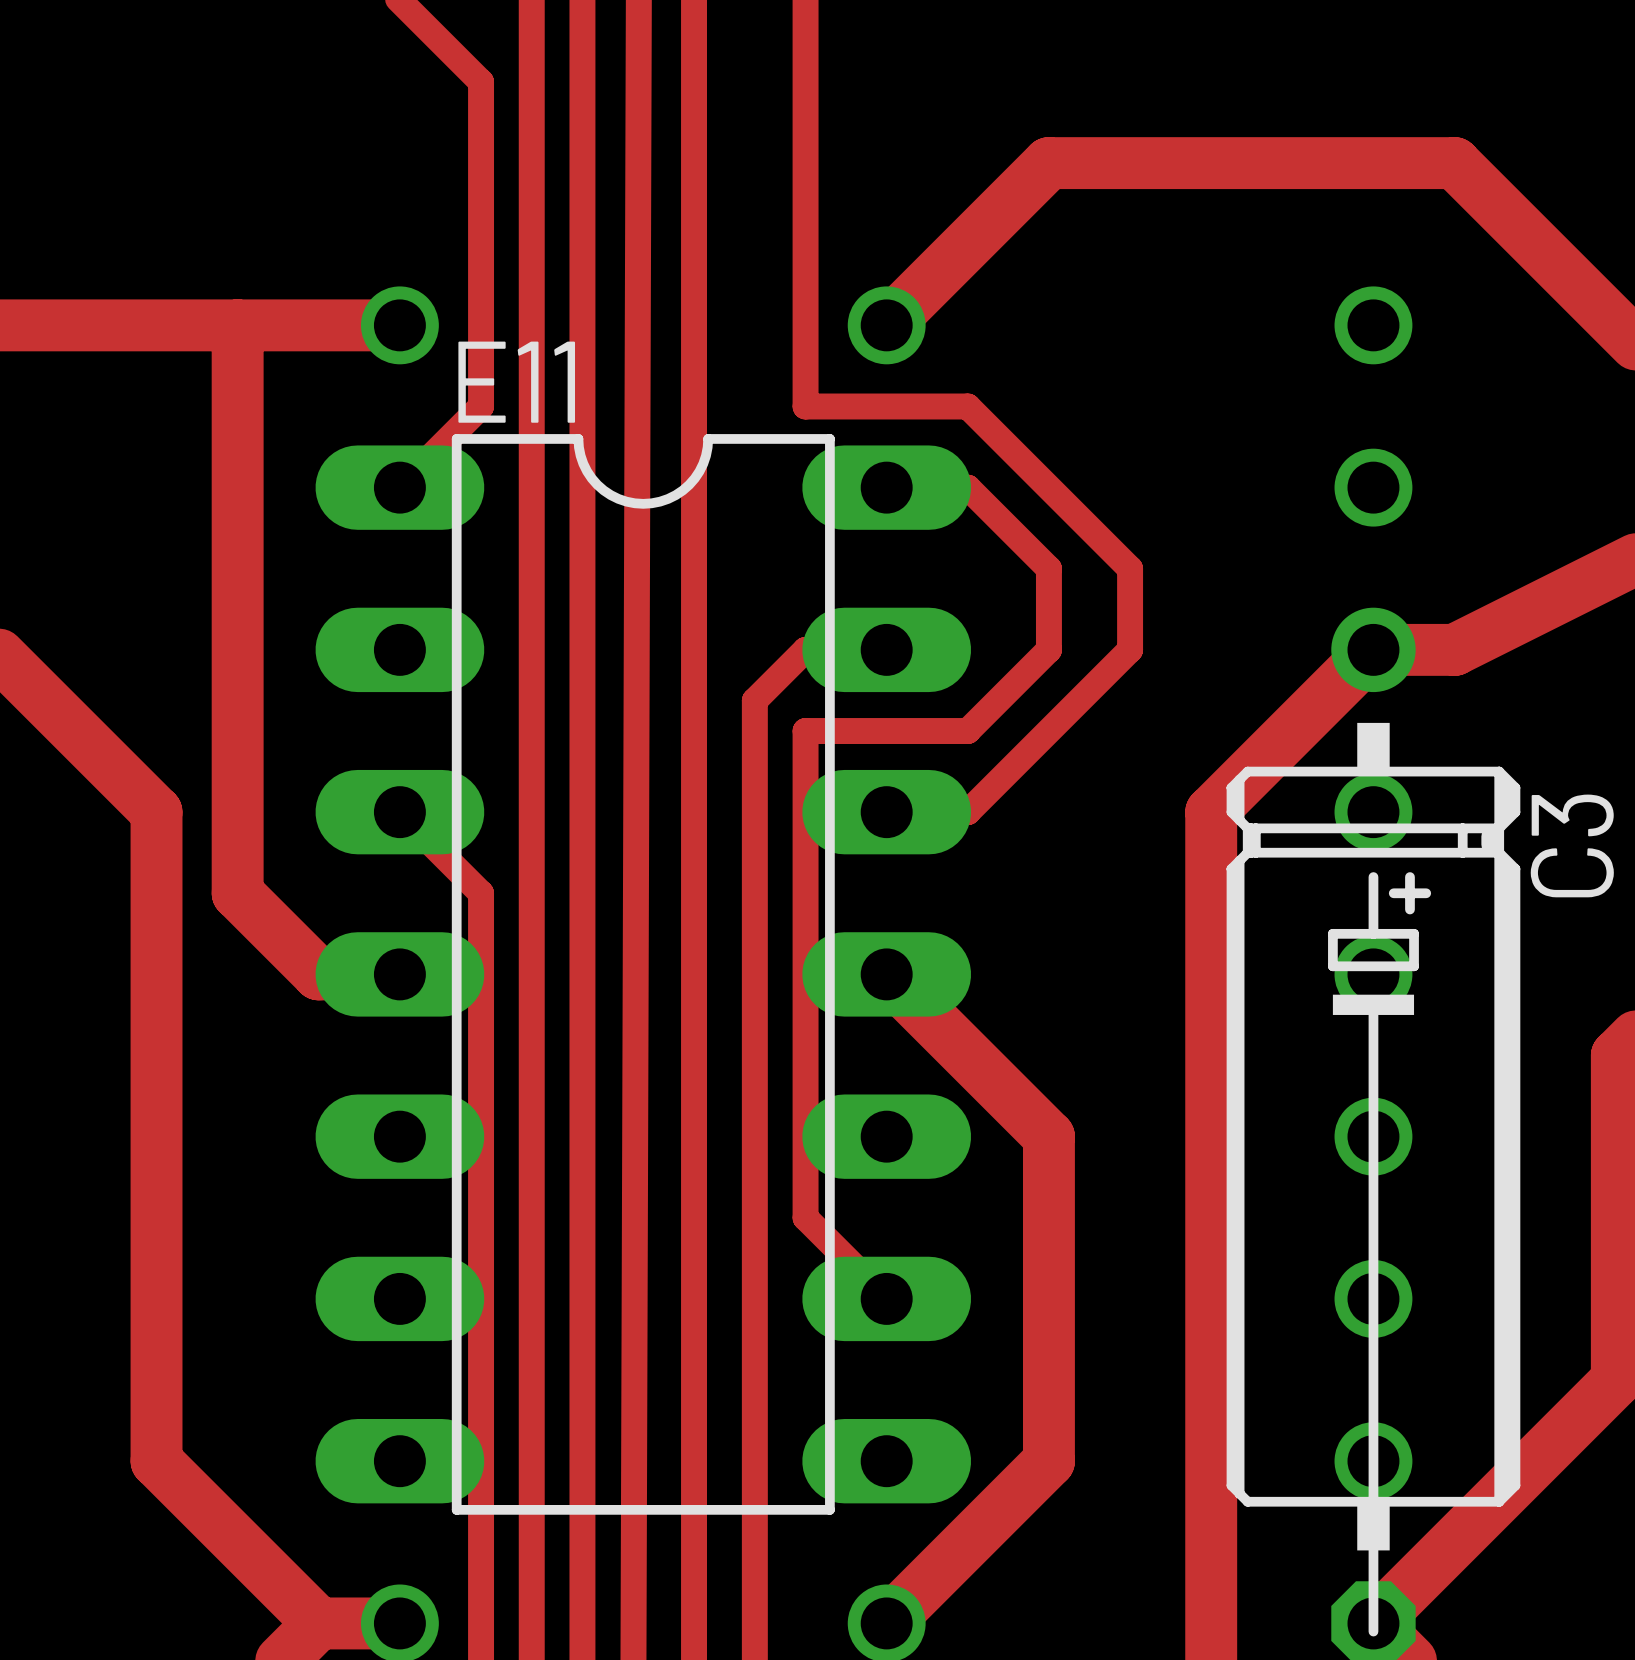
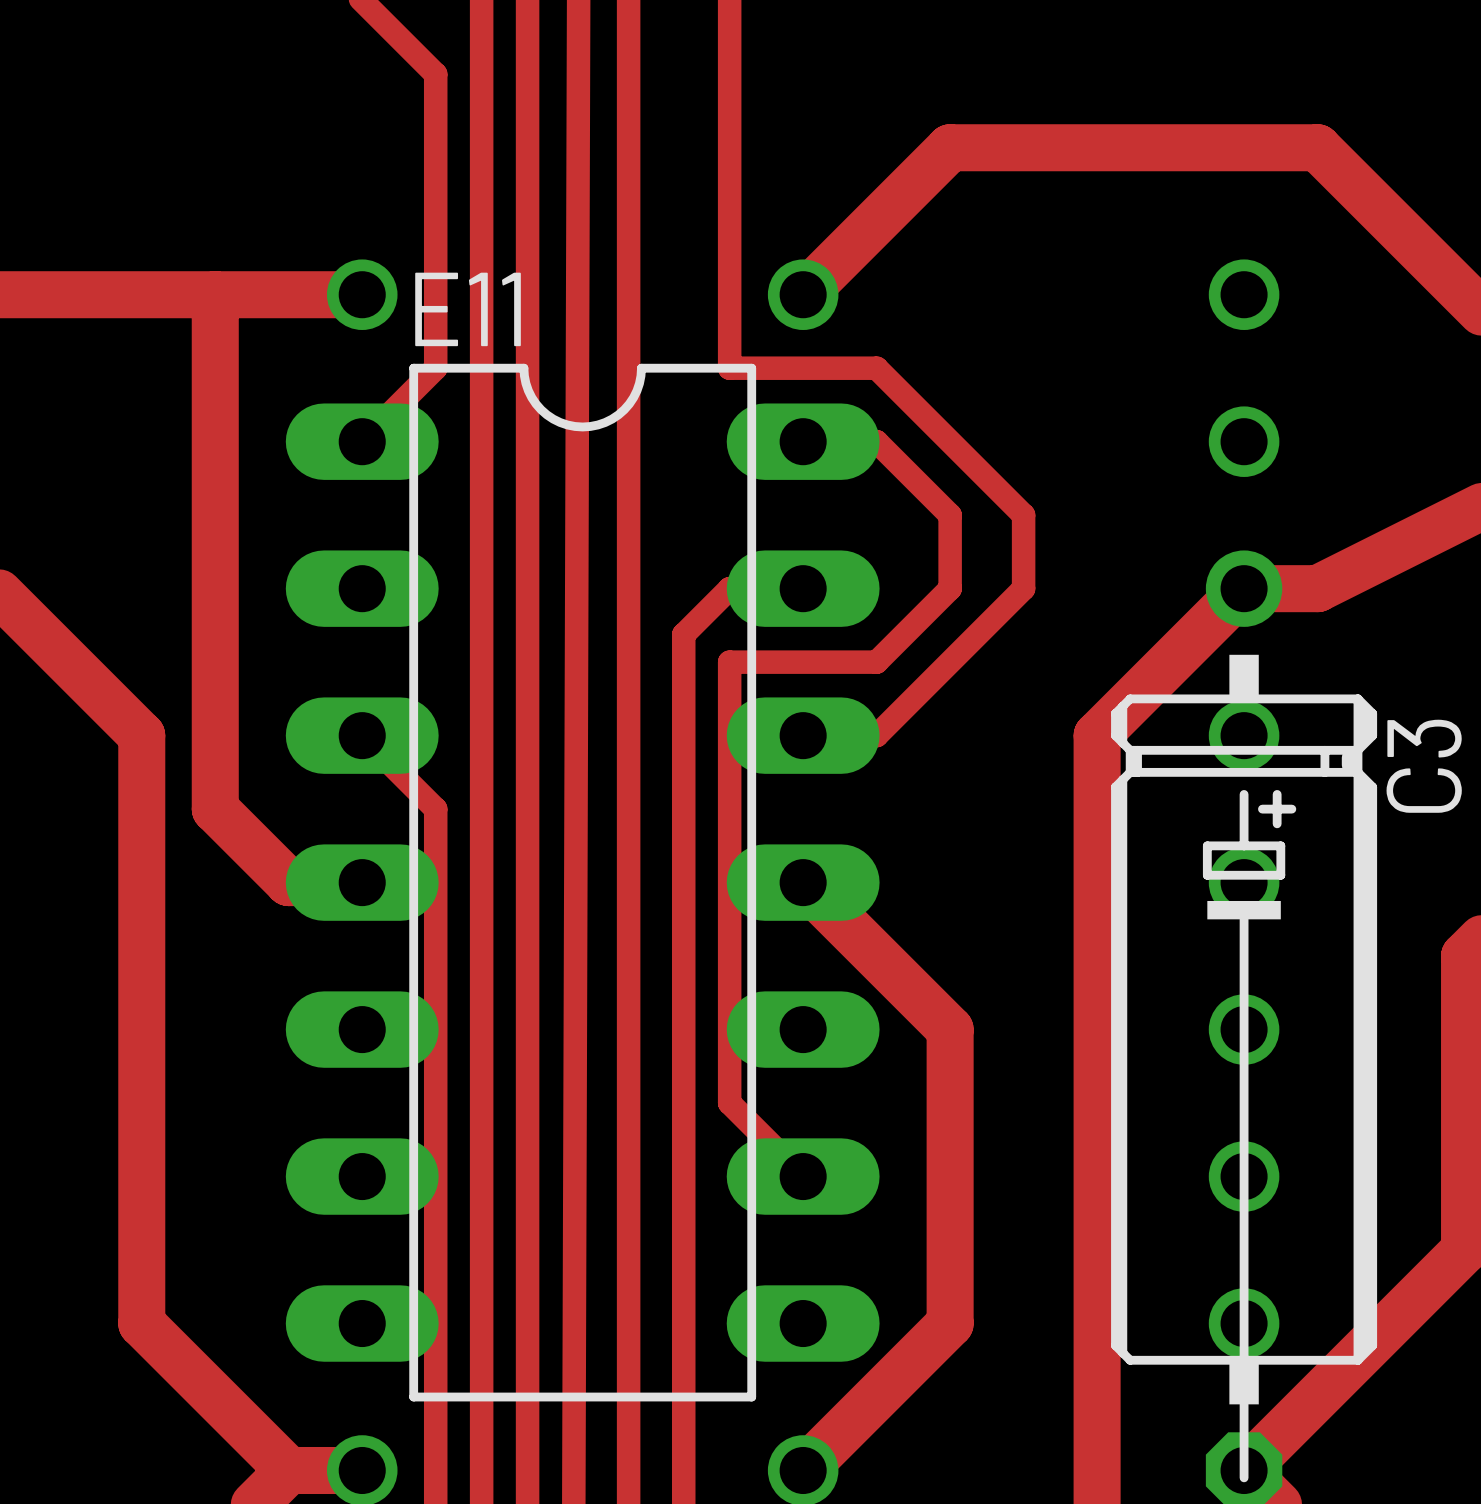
E11 name position: E11 (516, 382) -> E11 (468, 309)
E11 footprint: [315, 434, 972, 1515] -> [285, 363, 880, 1402]

